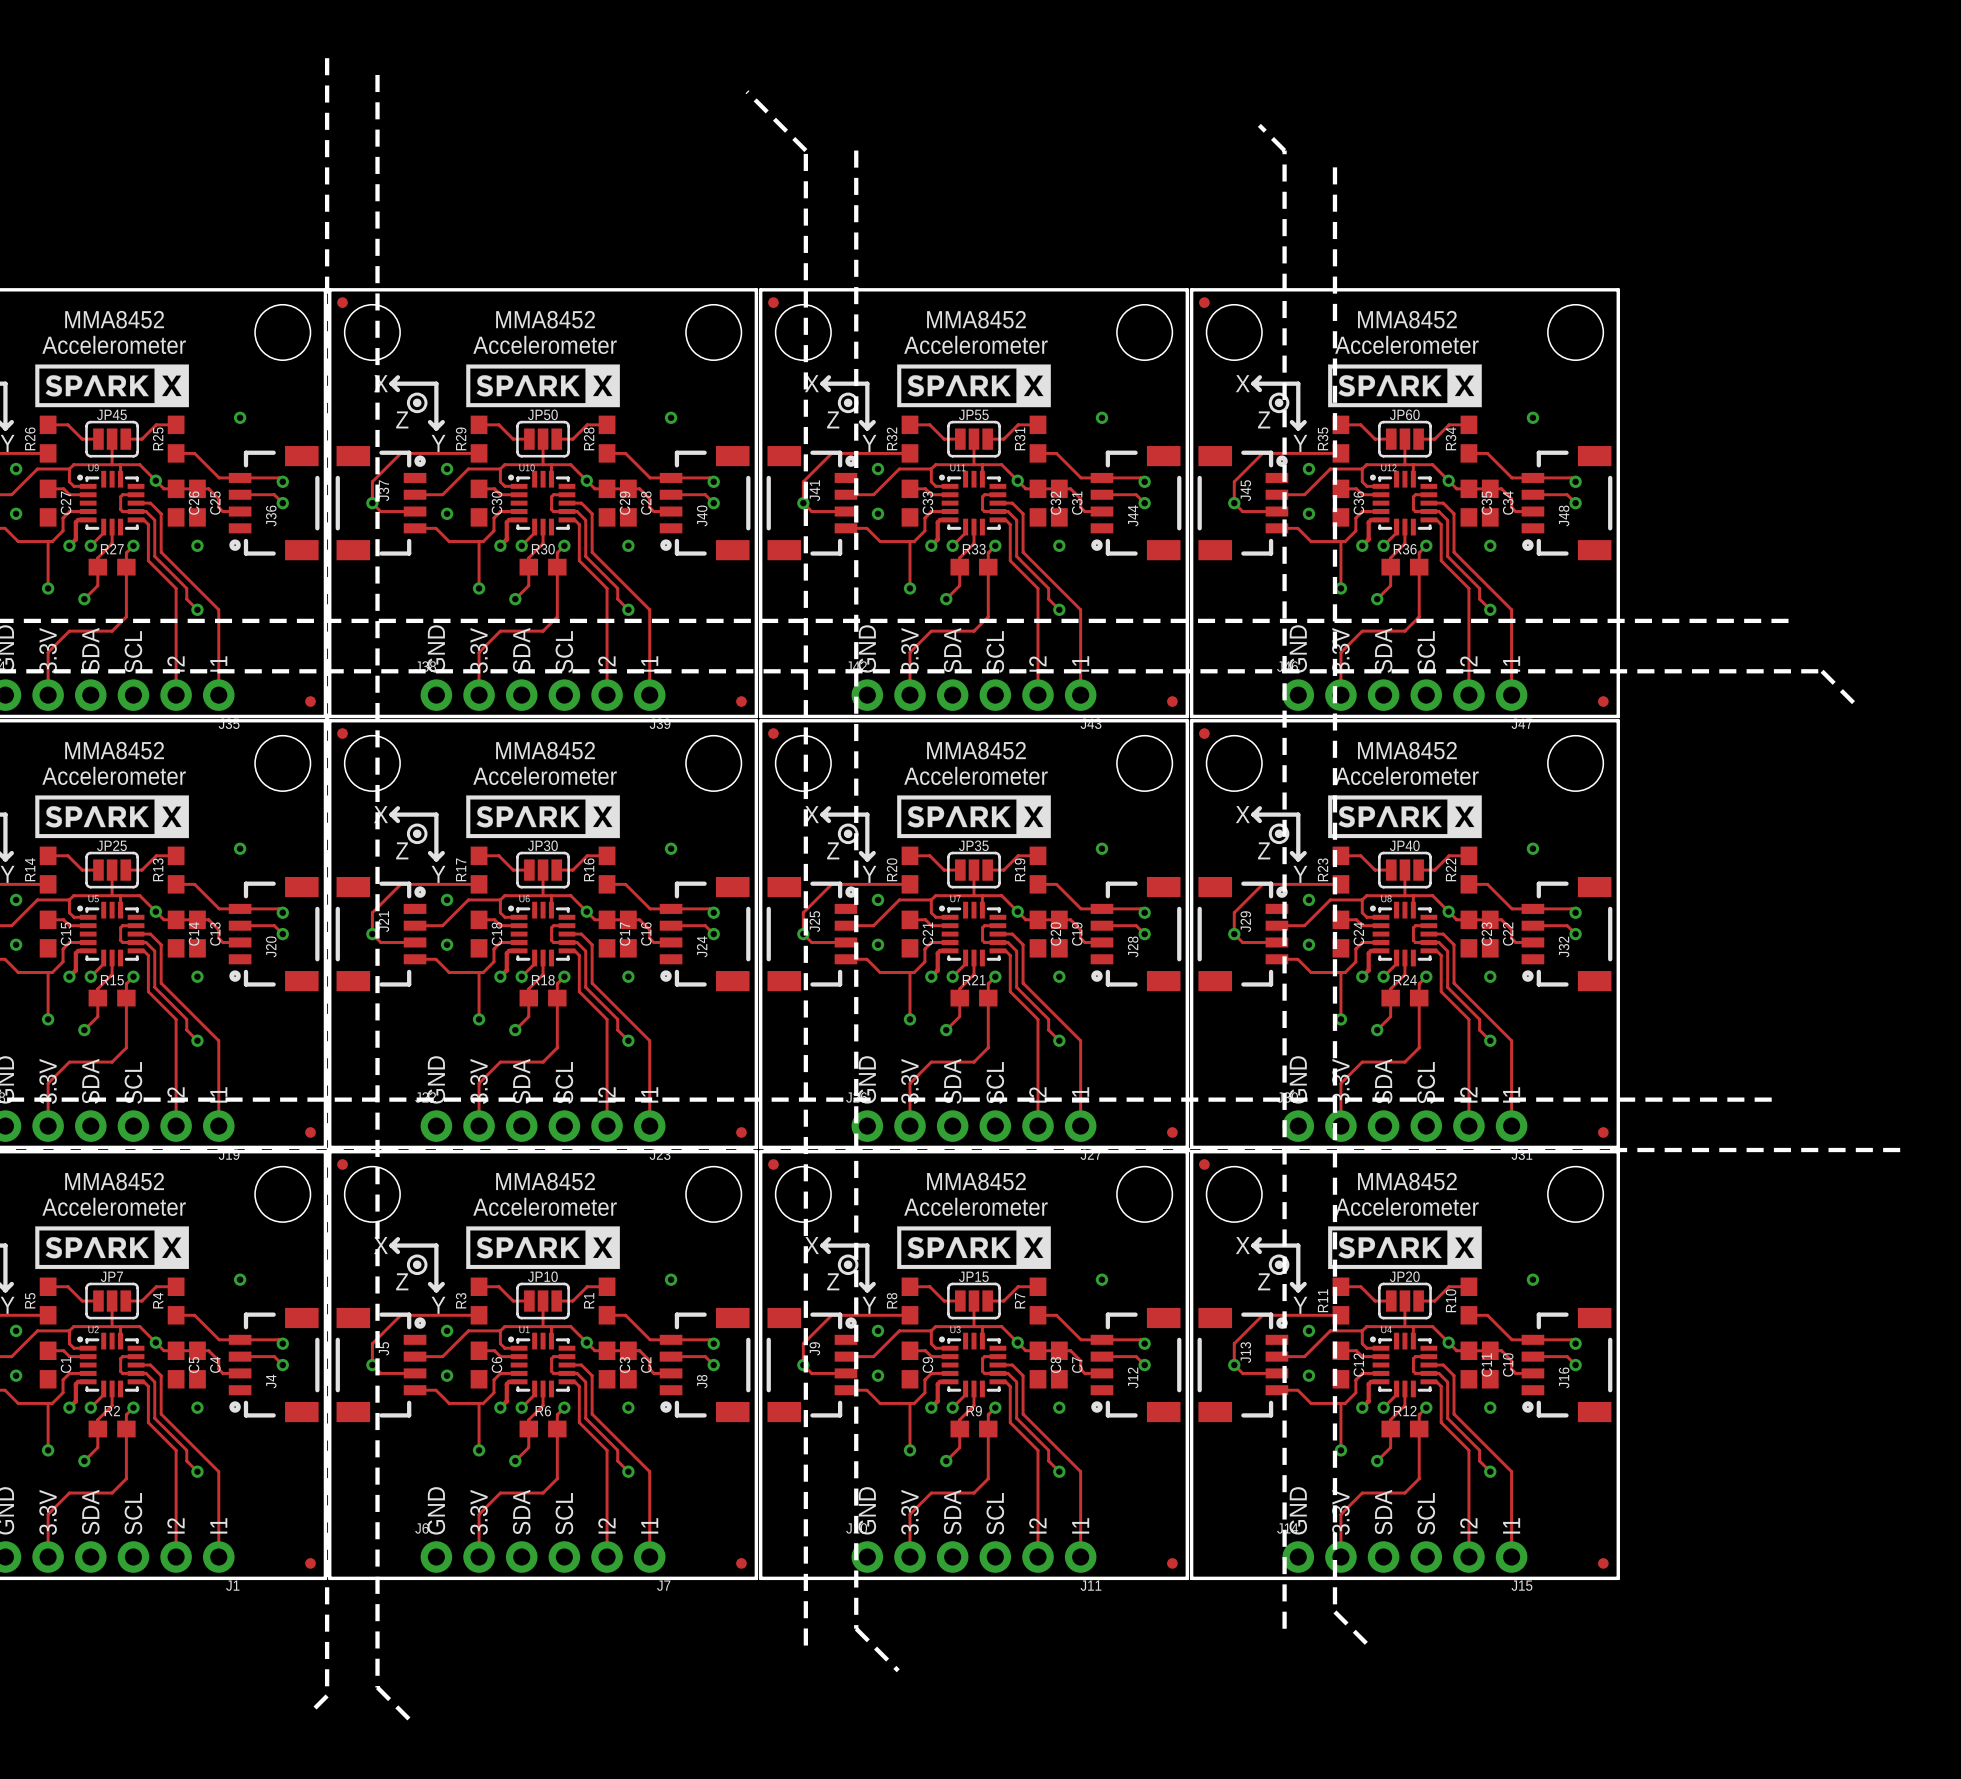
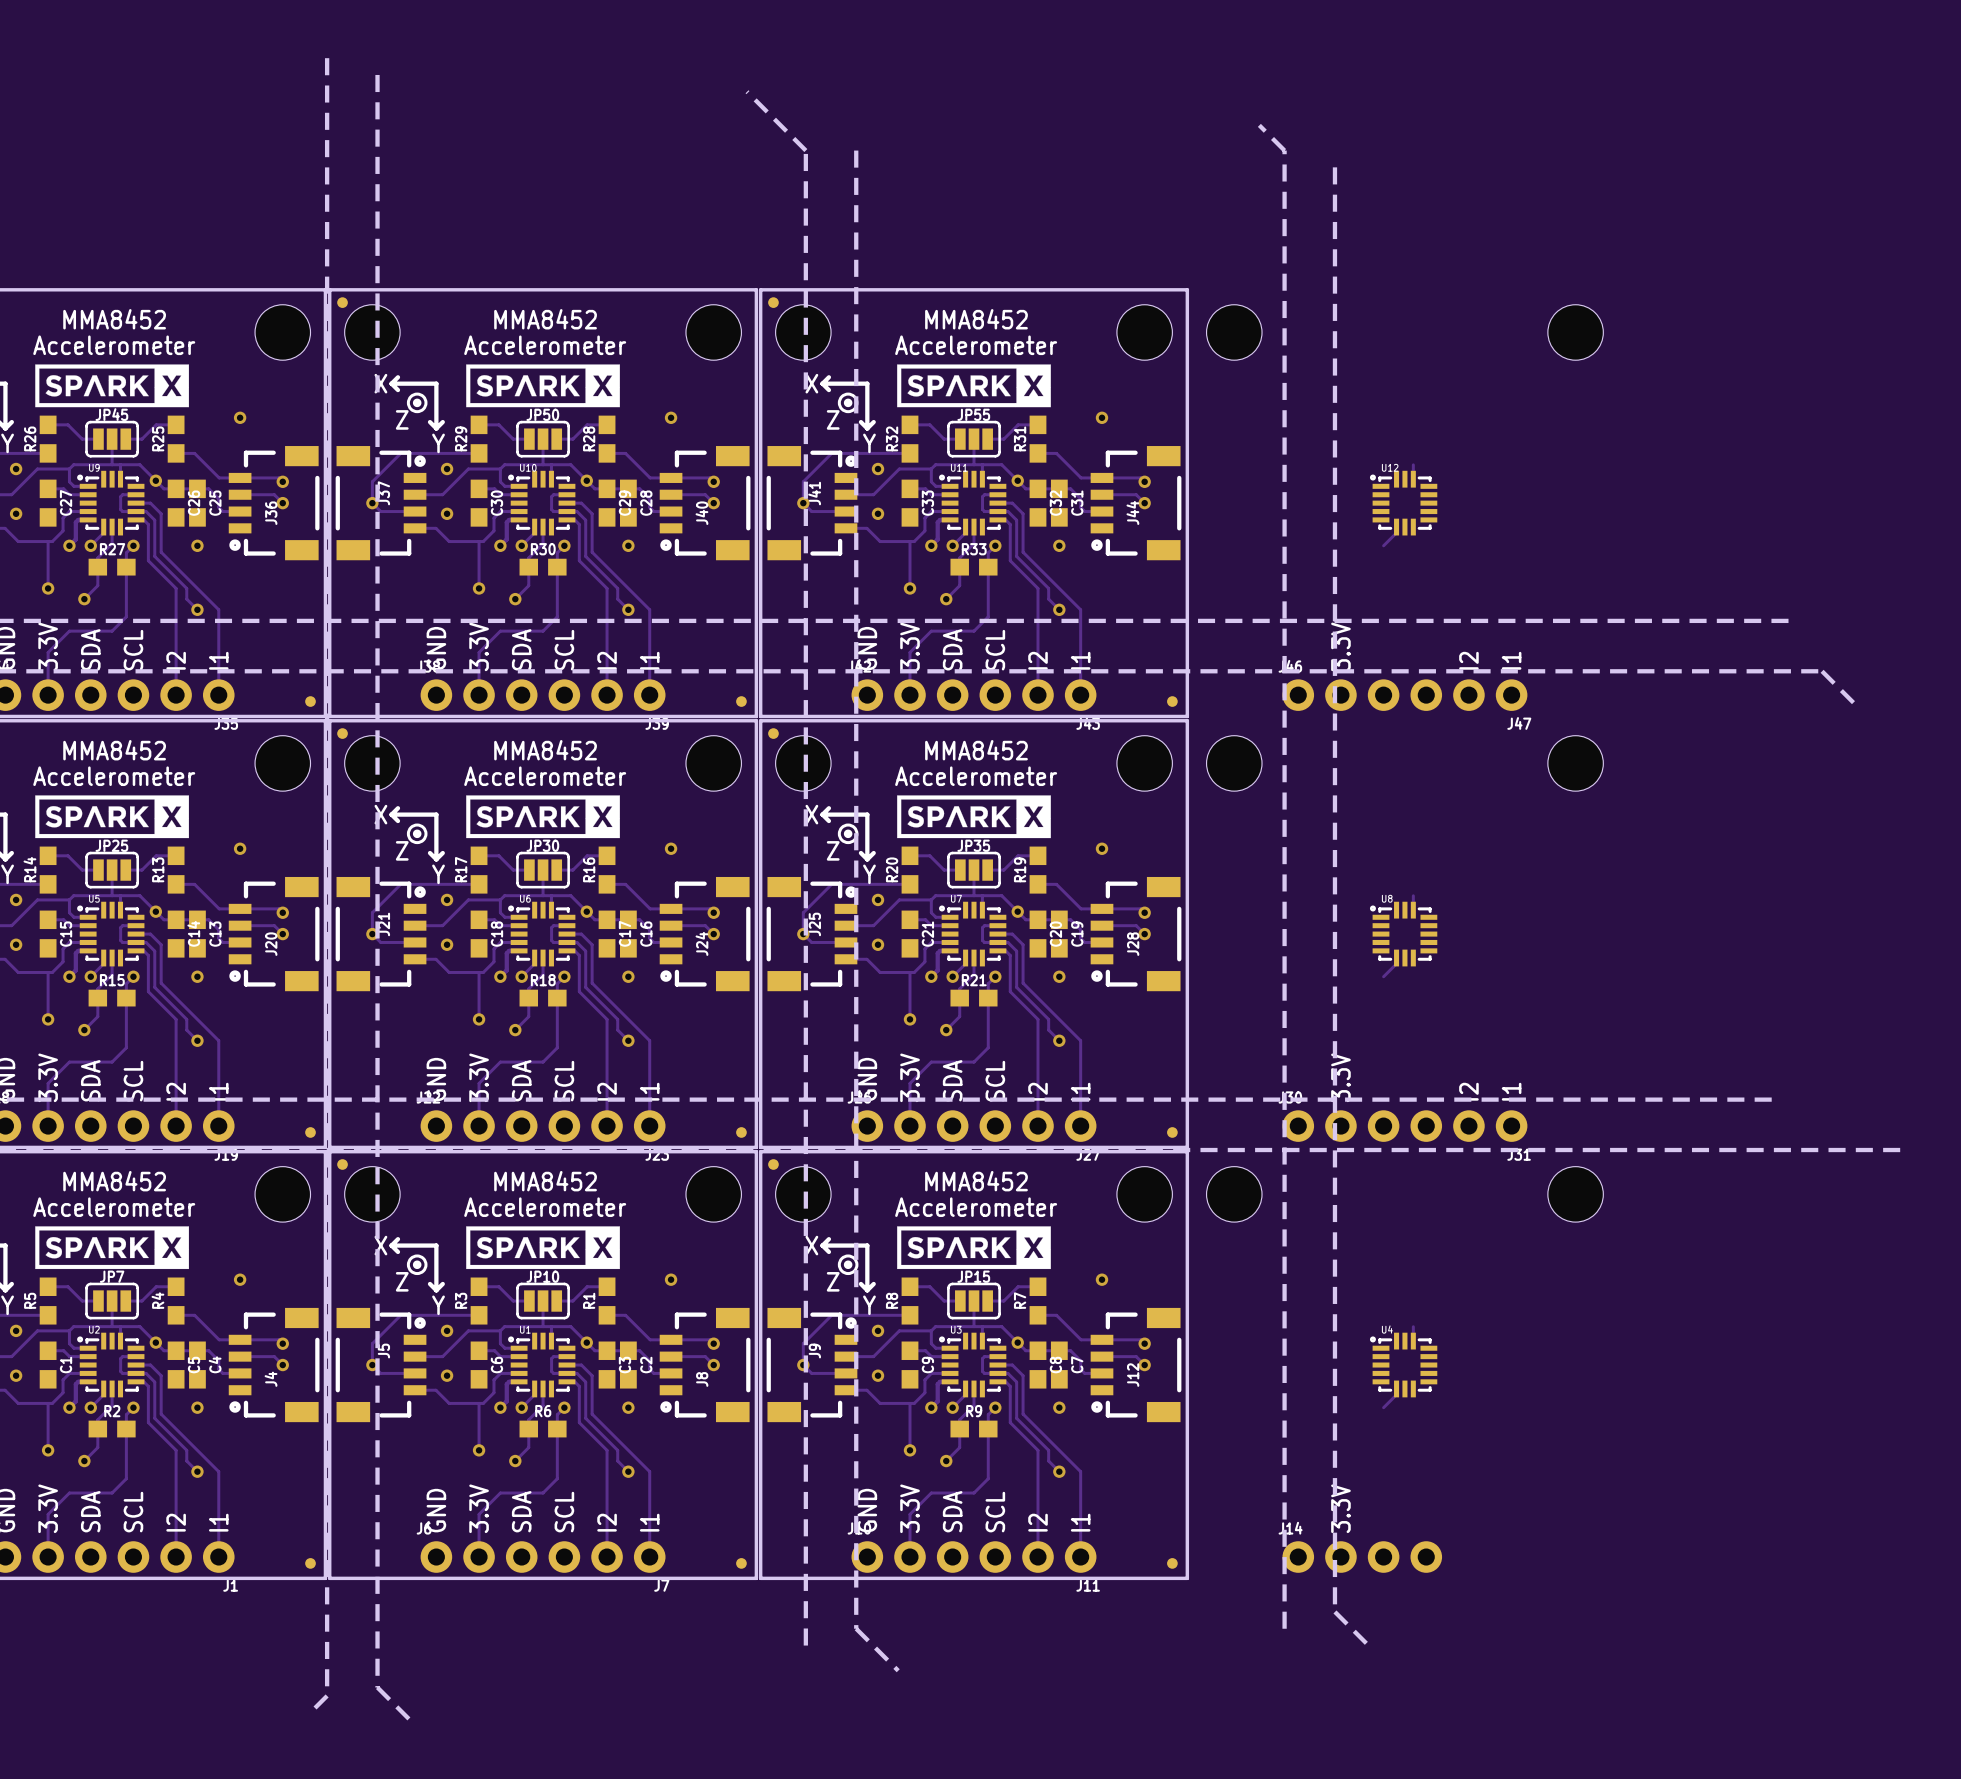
board edge: (1191, 289) (1191, 716) (1618, 716) (1618, 289) (1191, 289) -> none
part: (1204, 302) -> none
text: MMA8452 (1407, 319) -> none
text: Accelerometer (1406, 344) -> none
drawing: [1328, 364, 1482, 408] -> none
line: (1259, 377) (1253, 383) -> none
text: X (1242, 383) -> none
line: (1253, 383) (1259, 390) -> none
line: (1253, 383) (1298, 383) (1298, 428) -> none
drawing: [1268, 392, 1290, 414] -> none
via: (1532, 417) -> none
text: Z (1264, 419) -> none
line: (1291, 422) (1298, 428) -> none
line: (1304, 422) (1298, 428) -> none
track: (1340, 424) (1360, 424) (1375, 439) (1391, 439) -> none
track: (1468, 424) (1449, 424) (1434, 439) (1418, 439) -> none
R35: (1340, 439) -> none
track: (1404, 439) (1404, 464) -> none
JP60: (1404, 439) -> none
R34: (1468, 439) -> none
text: Y (1300, 443) -> none
track: (1340, 453) (1262, 453) (1234, 481) (1234, 503) (1242, 511) (1276, 511) -> none
track: (1468, 453) (1487, 453) (1512, 477) (1571, 477) (1575, 481) -> none
via: (1308, 469) -> none
track: (1362, 469) (1362, 481) (1366, 486) (1381, 486) -> none
track: (1362, 469) (1330, 469) (1304, 494) (1276, 494) -> none
track: (1362, 469) (1366, 464) (1432, 464) (1456, 488) (1501, 488) (1511, 498) (1511, 507) (1515, 511) (1532, 511) -> none
via: (1448, 480) -> none
via: (1575, 481) -> none
track: (1340, 488) (1356, 488) (1362, 494) (1381, 494) -> none
track: (1428, 494) (1415, 494) (1413, 496) (1413, 509) (1415, 511) (1438, 511) (1447, 520) (1447, 556) (1479, 588) (1479, 599) (1490, 609) -> none
track: (1532, 494) (1567, 494) (1575, 503) -> none
via: (1234, 503) -> none
J45: (1242, 503) -> none
C36: (1340, 503) -> none
track: (1428, 503) (1443, 503) (1454, 513) (1454, 552) (1511, 609) (1511, 695) -> none
C35: (1468, 503) -> none
C34: (1490, 503) -> none
J48: (1566, 503) -> none
via: (1575, 503) -> none
track: (1381, 511) (1362, 511) (1355, 518) (1355, 530) (1345, 541) (1311, 541) (1297, 528) (1276, 528) -> none
via: (1308, 513) -> none
track: (1381, 519) (1371, 519) (1368, 522) (1368, 539) (1362, 545) -> none
track: (1428, 519) (1436, 519) (1441, 524) (1441, 560) (1468, 588) (1468, 695) -> none
track: (1404, 527) (1404, 543) (1390, 557) (1390, 585) (1377, 599) -> none
track: (1340, 541) (1340, 588) -> none
via: (1362, 545) -> none
via: (1383, 545) -> none
track: (1426, 545) (1419, 552) (1419, 616) (1404, 631) (1362, 631) (1340, 652) (1340, 695) -> none
via: (1426, 545) -> none
via: (1490, 545) -> none
R36: (1404, 567) -> none
via: (1340, 588) -> none
via: (1377, 599) -> none
via: (1490, 609) -> none
text: GND (1298, 648) -> none
text: SDA (1383, 650) -> none
text: SCL (1426, 651) -> none
part: (1603, 701) -> none
board edge: (1191, 720) (1191, 1147) (1618, 1147) (1618, 720) (1191, 720) -> none
part: (1204, 733) -> none
text: MMA8452 (1407, 750) -> none
text: Accelerometer (1406, 775) -> none
drawing: [1328, 795, 1482, 839] -> none
line: (1259, 808) (1253, 814) -> none
text: X (1242, 814) -> none
line: (1253, 814) (1259, 821) -> none
line: (1253, 814) (1298, 814) (1298, 859) -> none
drawing: [1268, 823, 1290, 845] -> none
via: (1532, 848) -> none
text: Z (1264, 850) -> none
line: (1291, 853) (1298, 859) -> none
line: (1304, 853) (1298, 859) -> none
track: (1340, 855) (1360, 855) (1375, 870) (1391, 870) -> none
track: (1468, 855) (1449, 855) (1434, 870) (1418, 870) -> none
R23: (1340, 870) -> none
track: (1404, 870) (1404, 895) -> none
JP40: (1404, 870) -> none
R22: (1468, 870) -> none
text: Y (1300, 874) -> none
track: (1340, 884) (1262, 884) (1234, 912) (1234, 934) (1242, 942) (1276, 942) -> none
track: (1468, 884) (1487, 884) (1512, 908) (1571, 908) (1575, 912) -> none
via: (1308, 899) -> none
track: (1362, 899) (1362, 912) (1366, 917) (1381, 917) -> none
track: (1362, 899) (1330, 899) (1304, 925) (1276, 925) -> none
track: (1362, 899) (1366, 895) (1432, 895) (1456, 919) (1501, 919) (1511, 929) (1511, 938) (1515, 942) (1532, 942) -> none
via: (1448, 911) -> none
via: (1575, 912) -> none
track: (1340, 919) (1356, 919) (1362, 925) (1381, 925) -> none
track: (1428, 925) (1415, 925) (1413, 927) (1413, 940) (1415, 942) (1438, 942) (1447, 951) (1447, 987) (1479, 1019) (1479, 1030) (1490, 1040) -> none
track: (1532, 925) (1567, 925) (1575, 934) -> none
via: (1234, 934) -> none
J29: (1242, 934) -> none
C24: (1340, 934) -> none
track: (1428, 934) (1443, 934) (1454, 944) (1454, 983) (1511, 1040) (1511, 1126) -> none
C23: (1468, 934) -> none
C22: (1490, 934) -> none
J32: (1566, 934) -> none
via: (1575, 934) -> none
track: (1381, 942) (1362, 942) (1355, 949) (1355, 961) (1345, 972) (1311, 972) (1297, 959) (1276, 959) -> none
via: (1308, 944) -> none
track: (1381, 950) (1371, 950) (1368, 953) (1368, 970) (1362, 976) -> none
track: (1428, 950) (1436, 950) (1441, 955) (1441, 991) (1468, 1019) (1468, 1126) -> none
track: (1404, 958) (1404, 974) (1390, 988) (1390, 1016) (1377, 1030) -> none
track: (1340, 972) (1340, 1019) -> none
via: (1362, 976) -> none
via: (1383, 976) -> none
track: (1426, 976) (1419, 983) (1419, 1047) (1404, 1062) (1362, 1062) (1340, 1083) (1340, 1126) -> none
via: (1426, 976) -> none
via: (1490, 976) -> none
R24: (1404, 998) -> none
via: (1340, 1019) -> none
via: (1377, 1030) -> none
via: (1490, 1040) -> none
text: GND (1298, 1079) -> none
text: SDA (1383, 1081) -> none
text: SCL (1426, 1082) -> none
part: (1603, 1132) -> none
board edge: (1191, 1151) (1191, 1578) (1618, 1578) (1618, 1151) (1191, 1151) -> none
part: (1204, 1164) -> none
text: MMA8452 (1407, 1181) -> none
text: Accelerometer (1406, 1206) -> none
drawing: [1328, 1226, 1482, 1270] -> none
line: (1259, 1239) (1253, 1245) -> none
text: X (1242, 1245) -> none
line: (1253, 1245) (1259, 1251) -> none
line: (1253, 1245) (1298, 1245) (1298, 1290) -> none
drawing: [1268, 1254, 1290, 1276] -> none
via: (1532, 1279) -> none
text: Z (1264, 1281) -> none
line: (1291, 1283) (1298, 1290) -> none
line: (1304, 1283) (1298, 1290) -> none
track: (1340, 1286) (1360, 1286) (1375, 1301) (1391, 1301) -> none
track: (1468, 1286) (1449, 1286) (1434, 1301) (1418, 1301) -> none
R11: (1340, 1301) -> none
track: (1404, 1301) (1404, 1326) -> none
JP20: (1404, 1301) -> none
R10: (1468, 1301) -> none
text: Y (1300, 1305) -> none
track: (1340, 1315) (1262, 1315) (1234, 1343) (1234, 1365) (1242, 1373) (1276, 1373) -> none
track: (1468, 1315) (1487, 1315) (1512, 1339) (1571, 1339) (1575, 1343) -> none
via: (1308, 1330) -> none
track: (1362, 1330) (1330, 1330) (1304, 1356) (1276, 1356) -> none
track: (1362, 1330) (1362, 1343) (1366, 1348) (1381, 1348) -> none
track: (1362, 1330) (1366, 1326) (1432, 1326) (1456, 1350) (1501, 1350) (1511, 1360) (1511, 1369) (1515, 1373) (1532, 1373) -> none
via: (1448, 1342) -> none
via: (1575, 1343) -> none
track: (1340, 1350) (1356, 1350) (1362, 1356) (1381, 1356) -> none
track: (1428, 1356) (1415, 1356) (1413, 1358) (1413, 1371) (1415, 1373) (1438, 1373) (1447, 1382) (1447, 1418) (1479, 1450) (1479, 1461) (1490, 1471) -> none
track: (1532, 1356) (1567, 1356) (1575, 1365) -> none
via: (1234, 1365) -> none
J13: (1242, 1365) -> none
C12: (1340, 1365) -> none
track: (1428, 1365) (1443, 1365) (1454, 1375) (1454, 1414) (1511, 1471) (1511, 1557) -> none
C11: (1468, 1365) -> none
C10: (1490, 1365) -> none
J16: (1566, 1365) -> none
via: (1575, 1365) -> none
track: (1381, 1373) (1362, 1373) (1355, 1379) (1355, 1392) (1345, 1403) (1311, 1403) (1297, 1390) (1276, 1390) -> none
via: (1308, 1375) -> none
track: (1381, 1381) (1371, 1381) (1368, 1384) (1368, 1401) (1362, 1407) -> none
track: (1428, 1381) (1436, 1381) (1441, 1386) (1441, 1422) (1468, 1450) (1468, 1557) -> none
track: (1404, 1388) (1404, 1405) (1390, 1419) (1390, 1447) (1377, 1461) -> none
track: (1340, 1403) (1340, 1450) -> none
via: (1362, 1407) -> none
via: (1383, 1407) -> none
track: (1426, 1407) (1419, 1414) (1419, 1478) (1404, 1493) (1362, 1493) (1340, 1514) (1340, 1557) -> none
via: (1426, 1407) -> none
via: (1490, 1407) -> none
R12: (1404, 1429) -> none
via: (1340, 1450) -> none
via: (1377, 1461) -> none
via: (1490, 1471) -> none
text: GND (1298, 1510) -> none
text: SDA (1383, 1512) -> none
text: SCL (1426, 1513) -> none
text: I2 (1468, 1525) -> none
text: I1 (1511, 1525) -> none
J15: (1490, 1557) -> none
part: (1603, 1563) -> none

